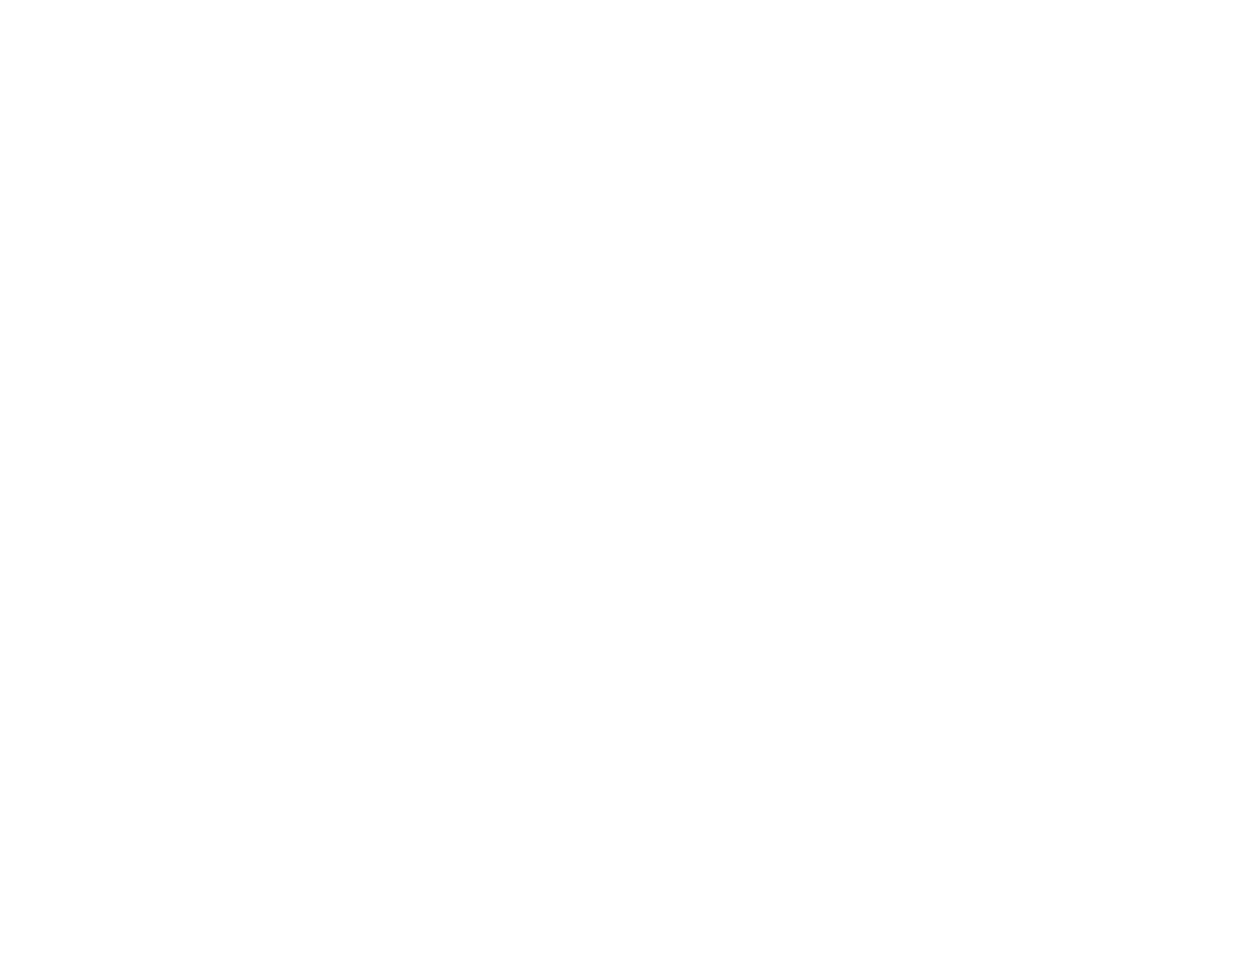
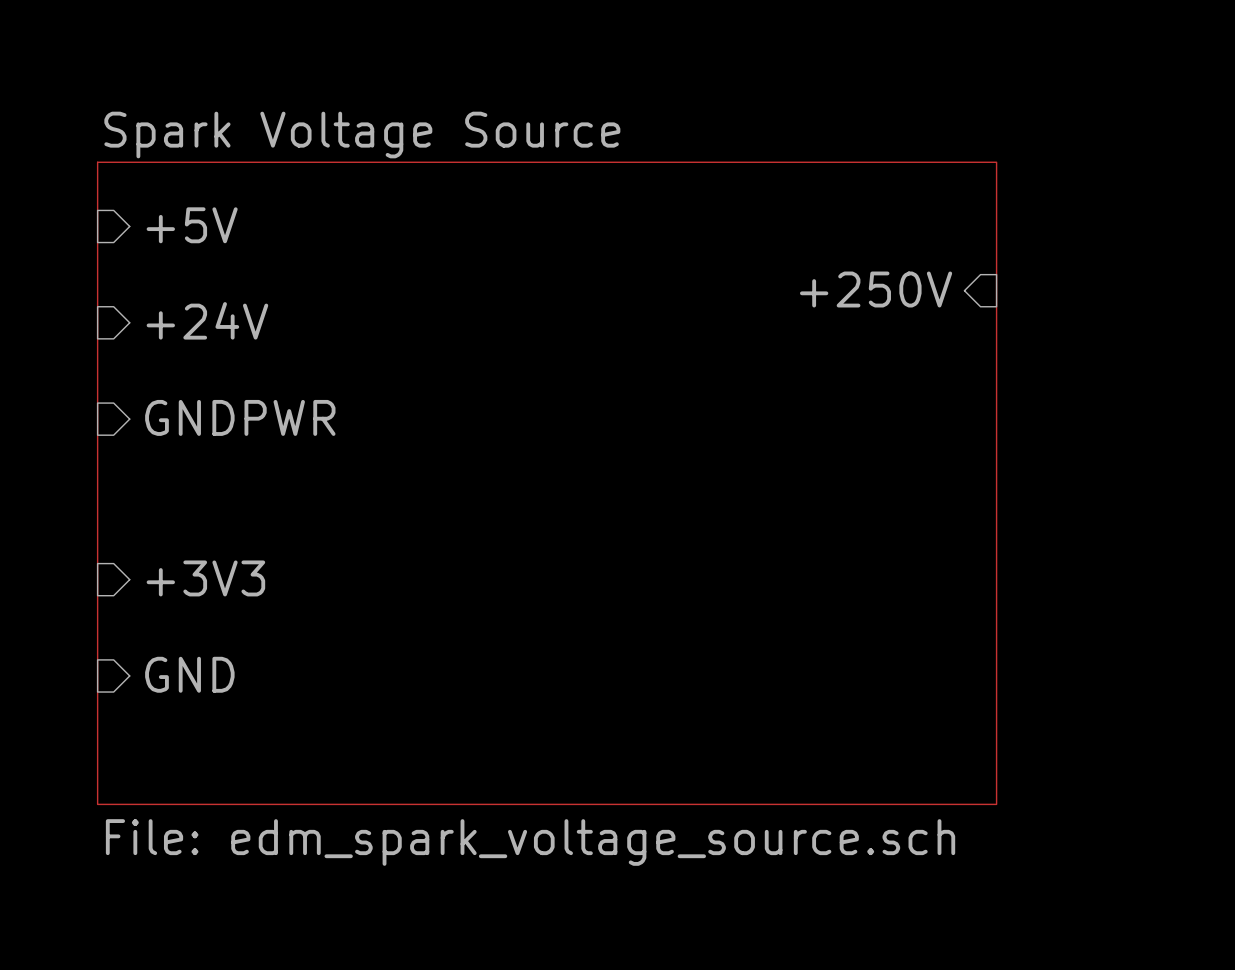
sheet pin: none -> +5V (192, 225)
sheet pin: none -> +250V (876, 289)
sheet pin: none -> +24V (207, 320)
sheet pin: none -> GNDPWR (240, 417)
sheet Spark Voltage Source: none -> File: edm_spark_voltage_source.sch (547, 483)
sheet pin: none -> +3V3 (205, 578)
sheet pin: none -> GND (189, 674)

